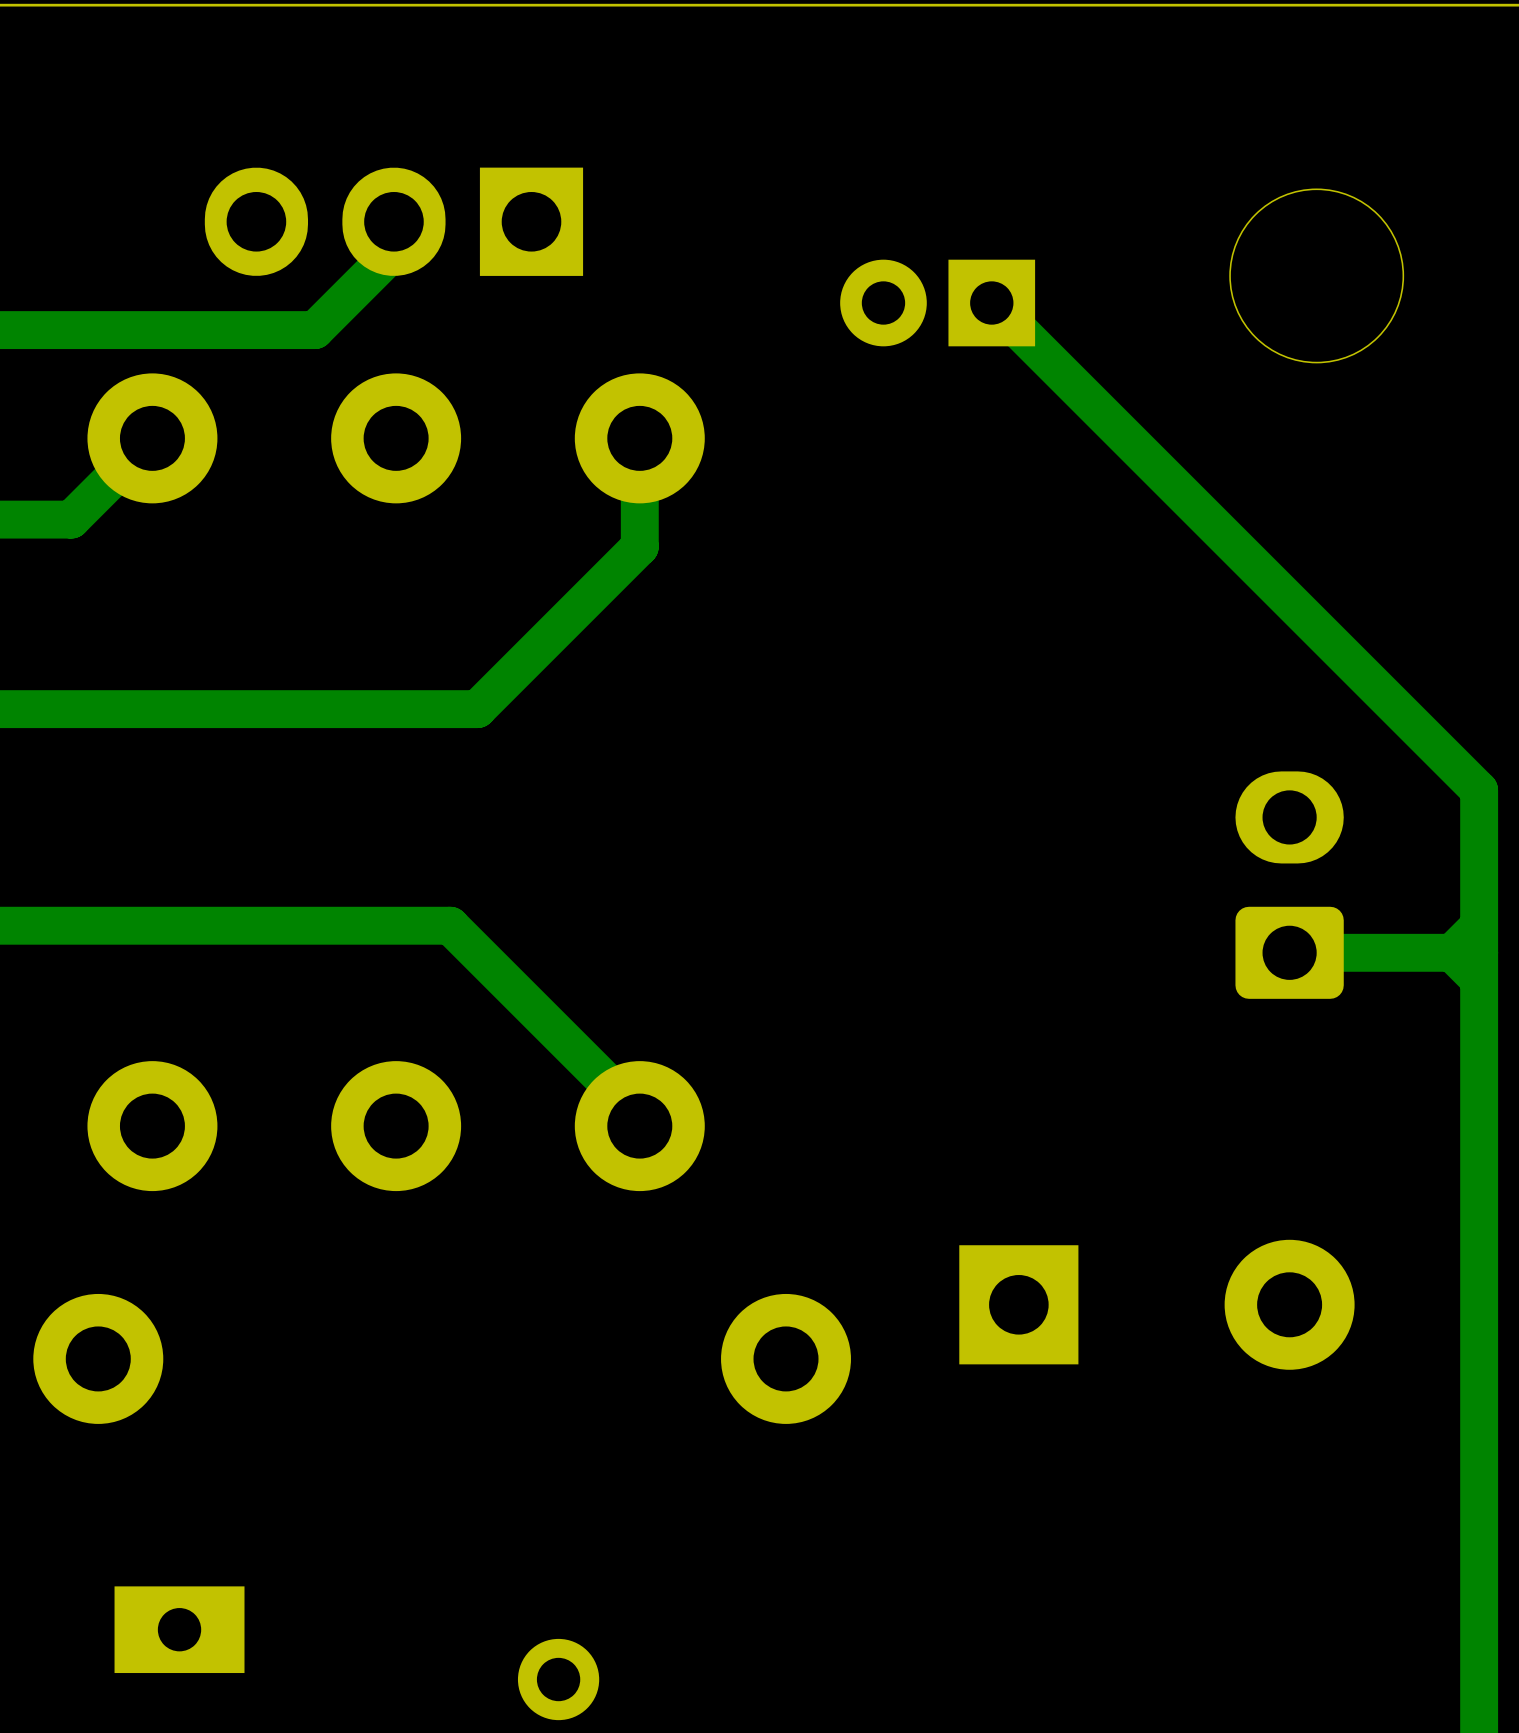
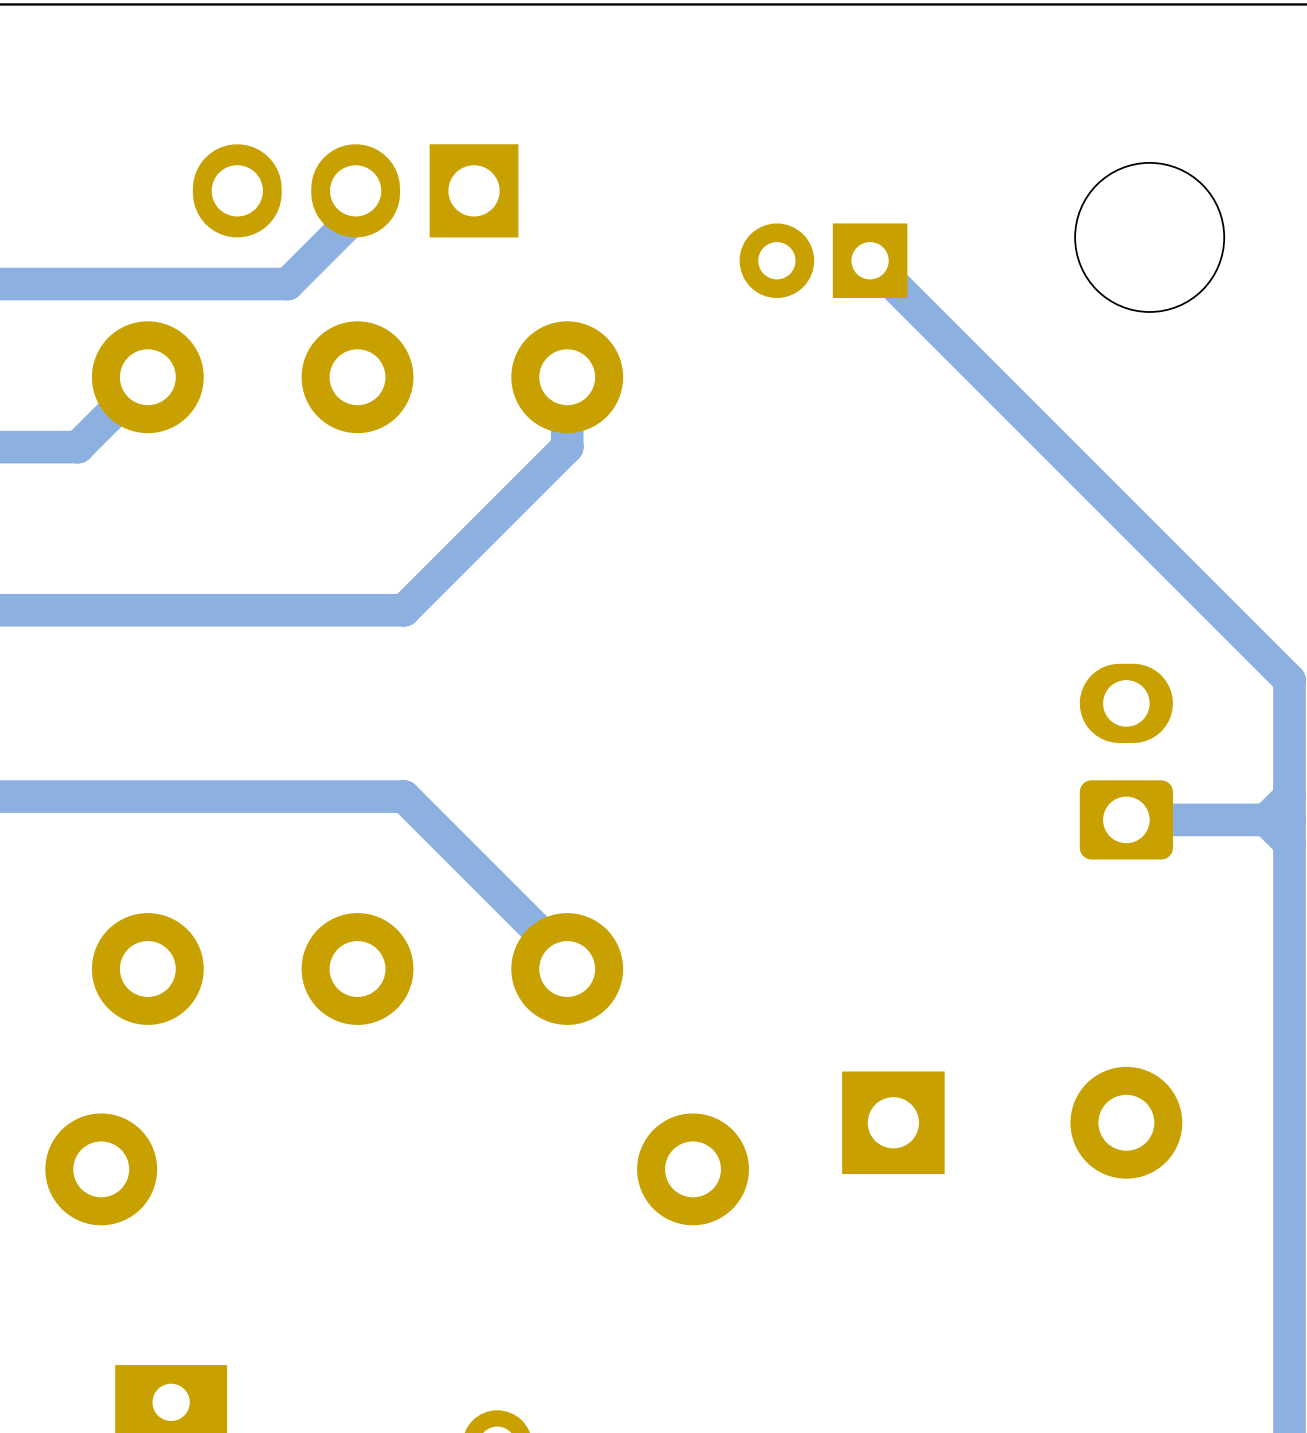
track: (639, 519) (639, 546) (477, 709) (450, 709) -> (567, 447) (404, 610)

